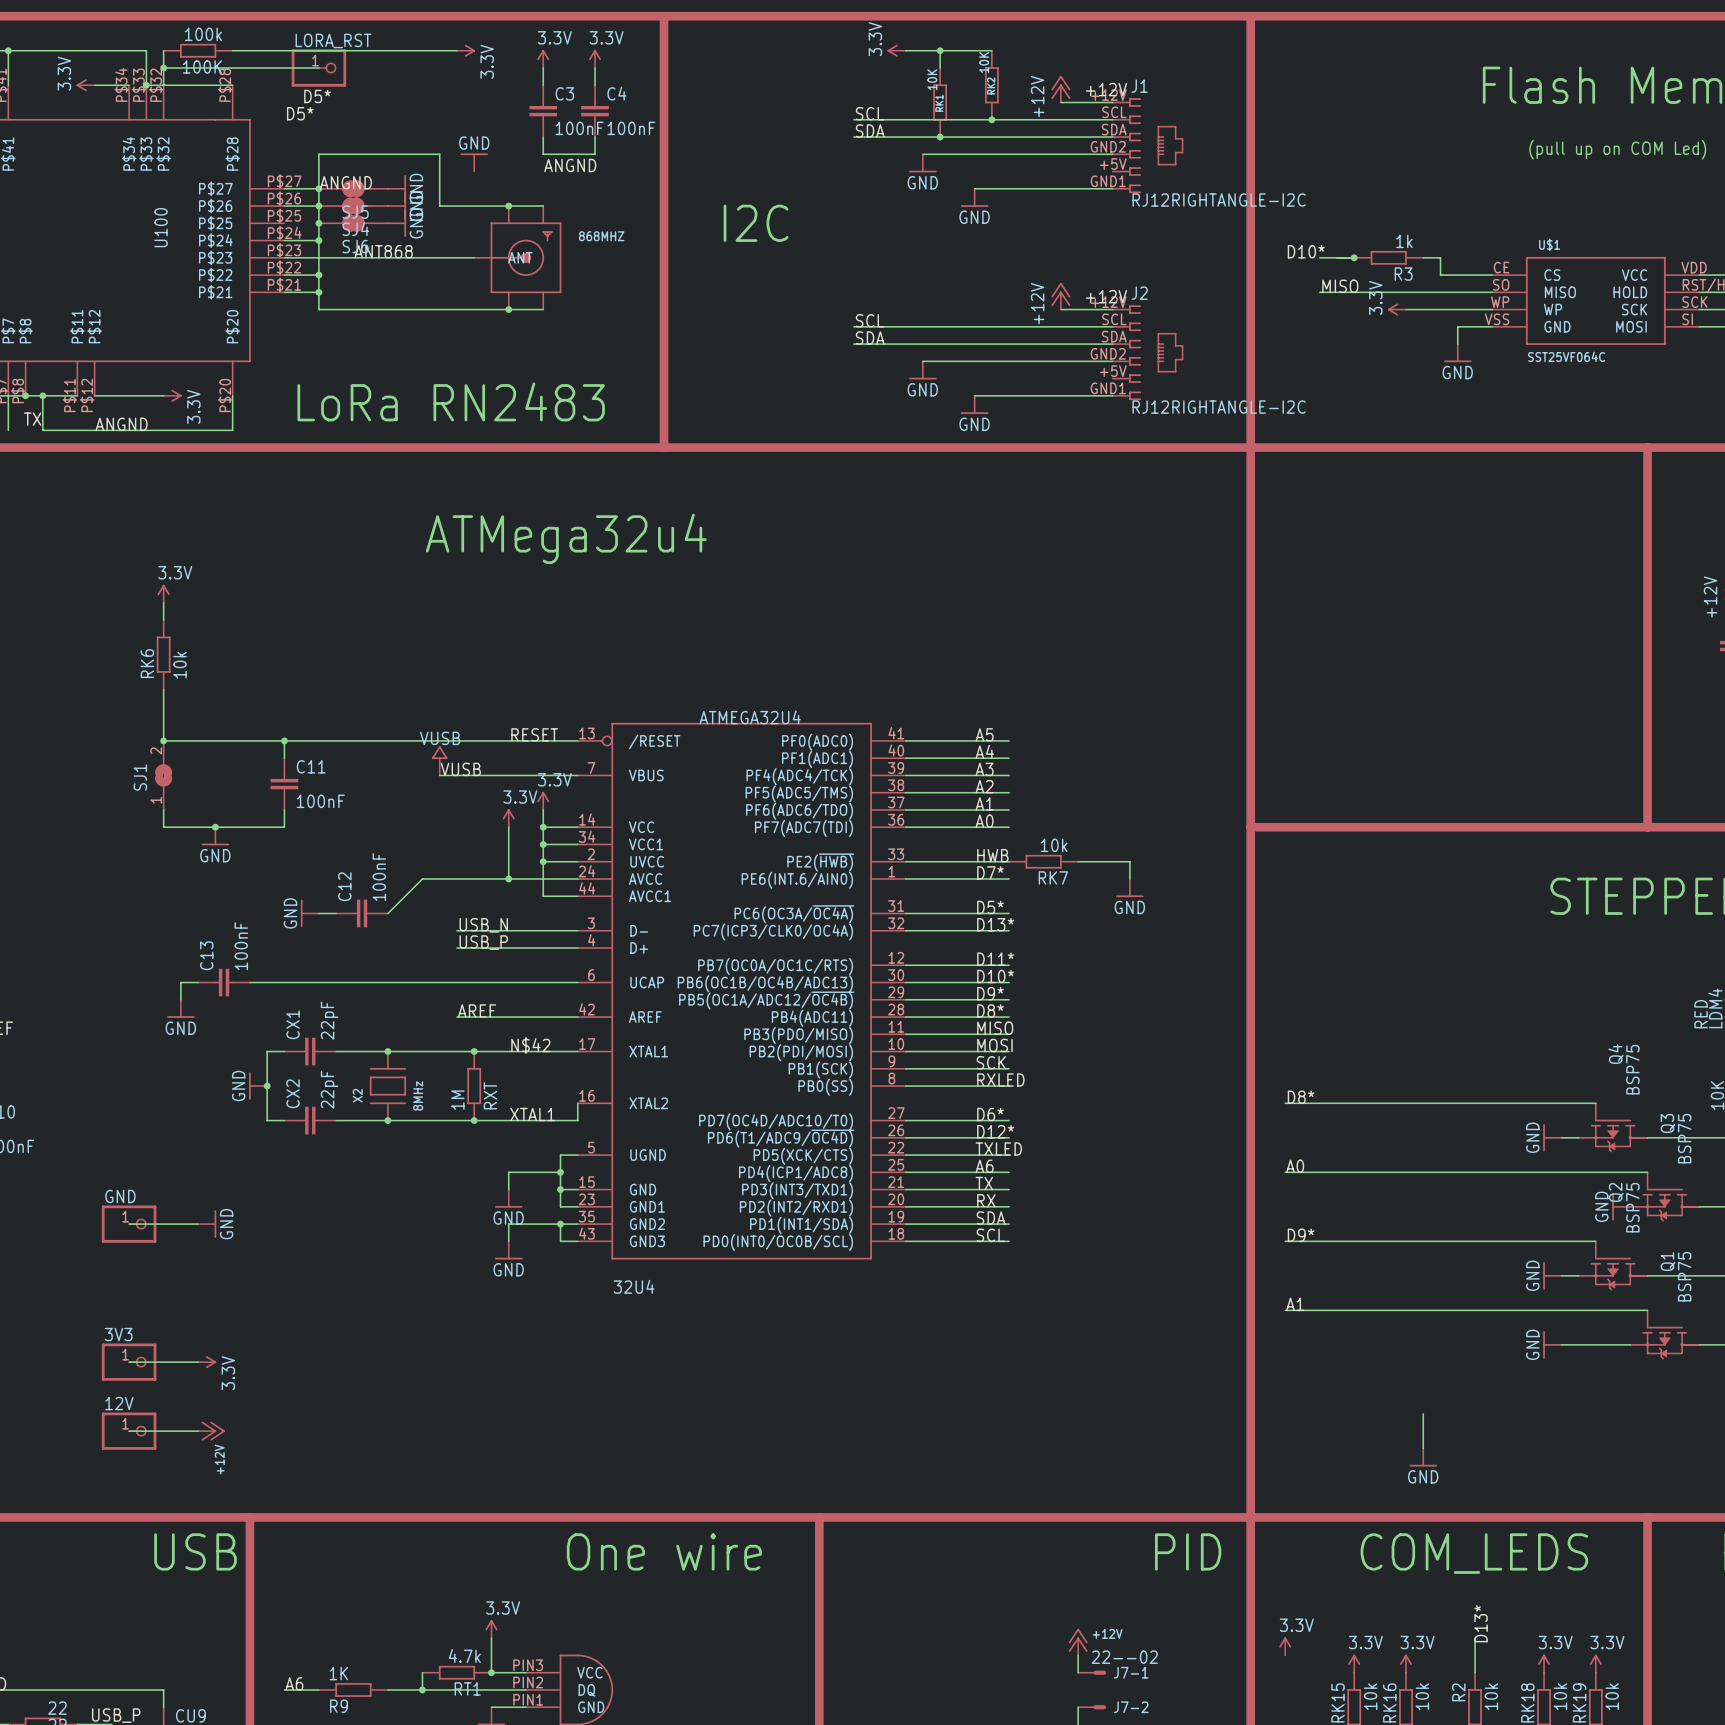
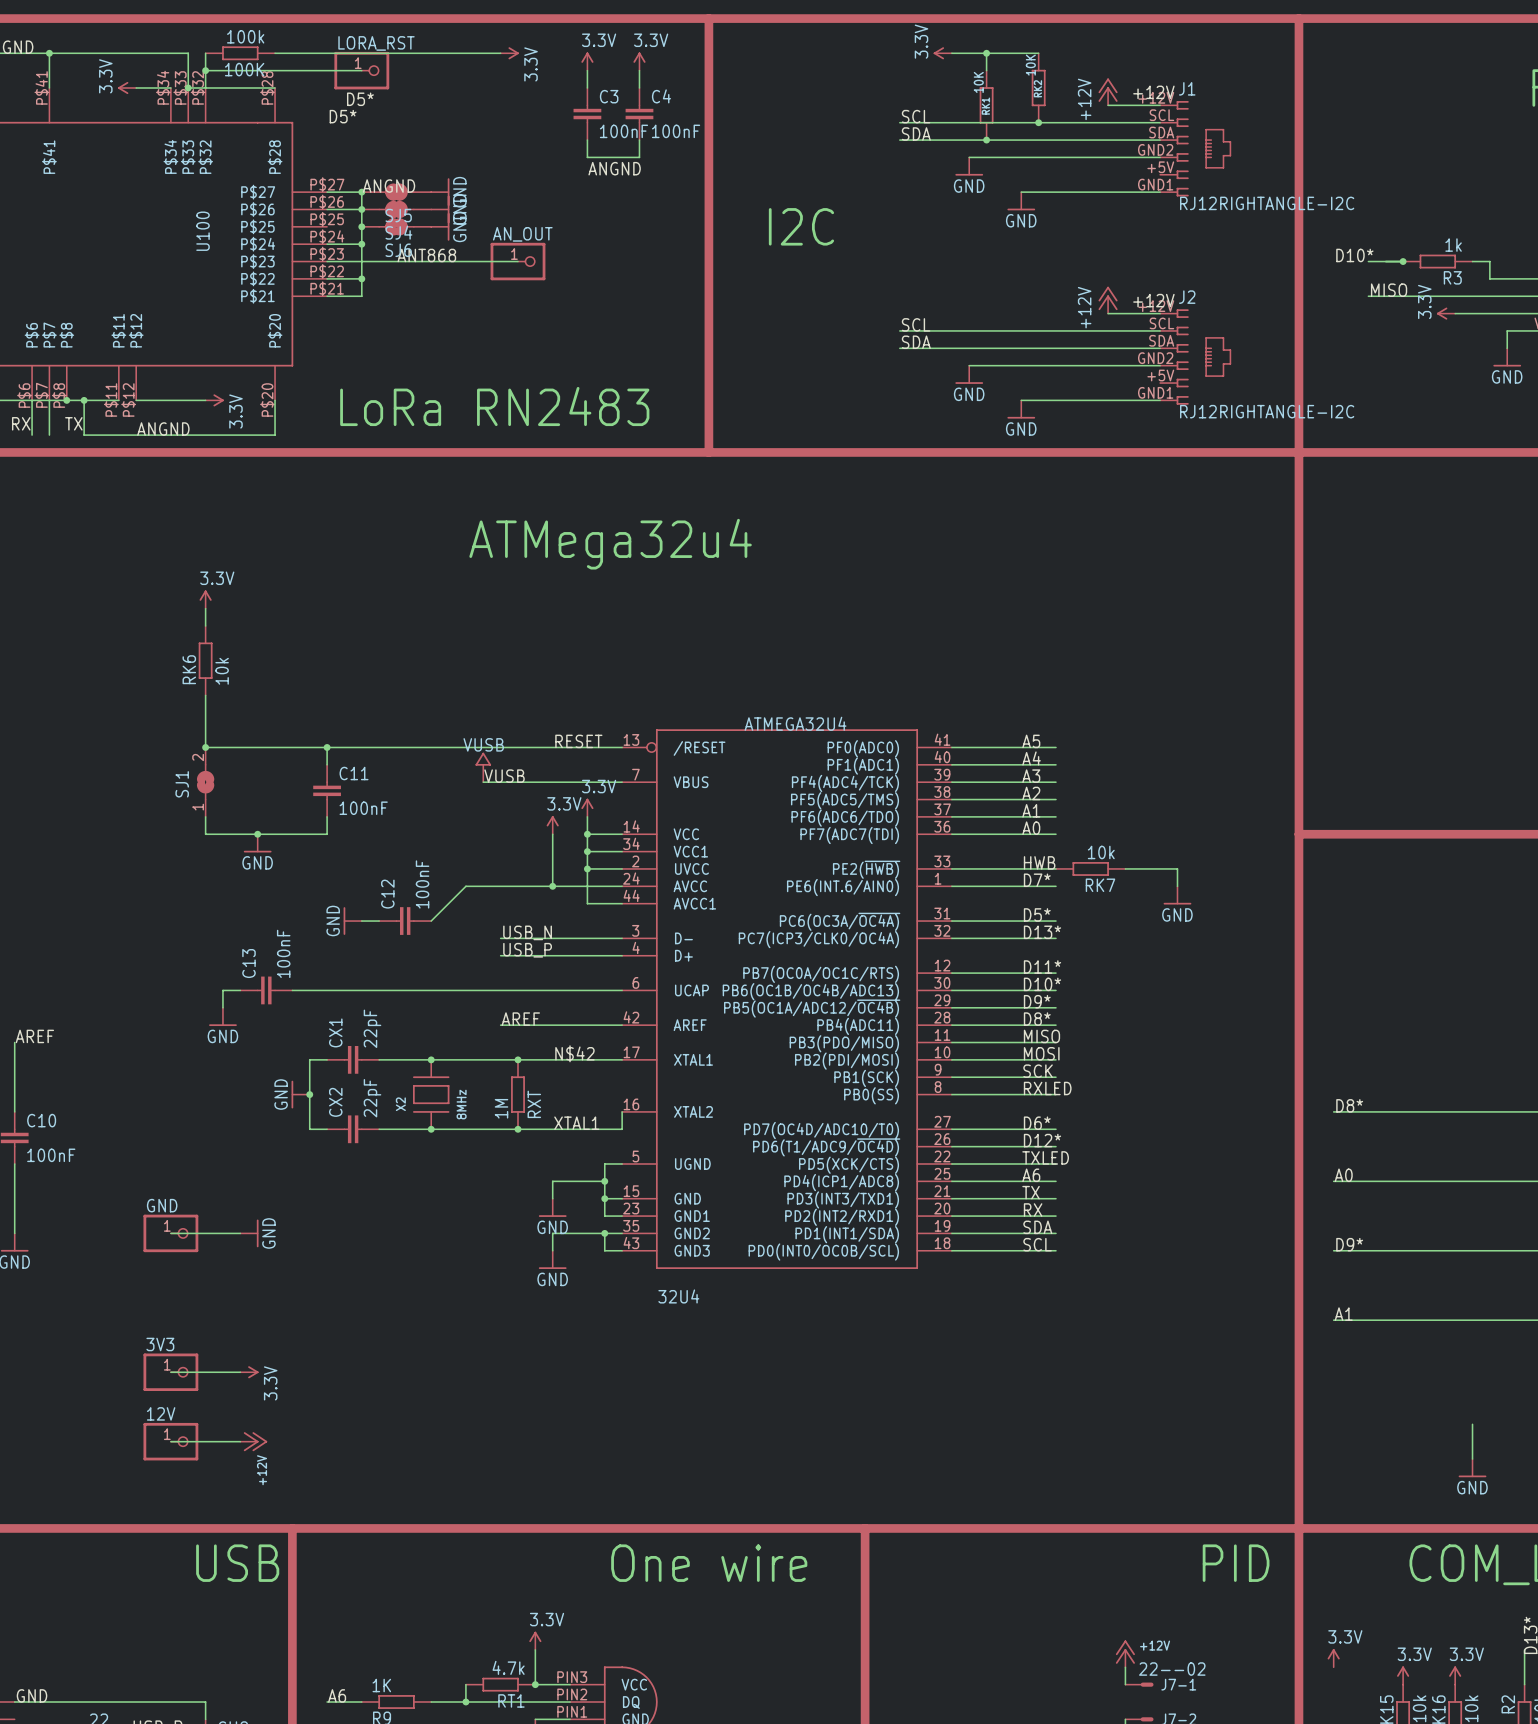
power symbol: GND (474, 162) -> none
wire: (318, 188) (318, 154) (439, 154) (439, 206) (543, 206) -> none
junction: (508, 206) -> none
AN_OUT: none -> (518, 261)
868MHZ: (517, 257) -> none
wire: (318, 292) (318, 309) (543, 309) -> none
junction: (318, 292) -> none
junction: (508, 309) -> none

